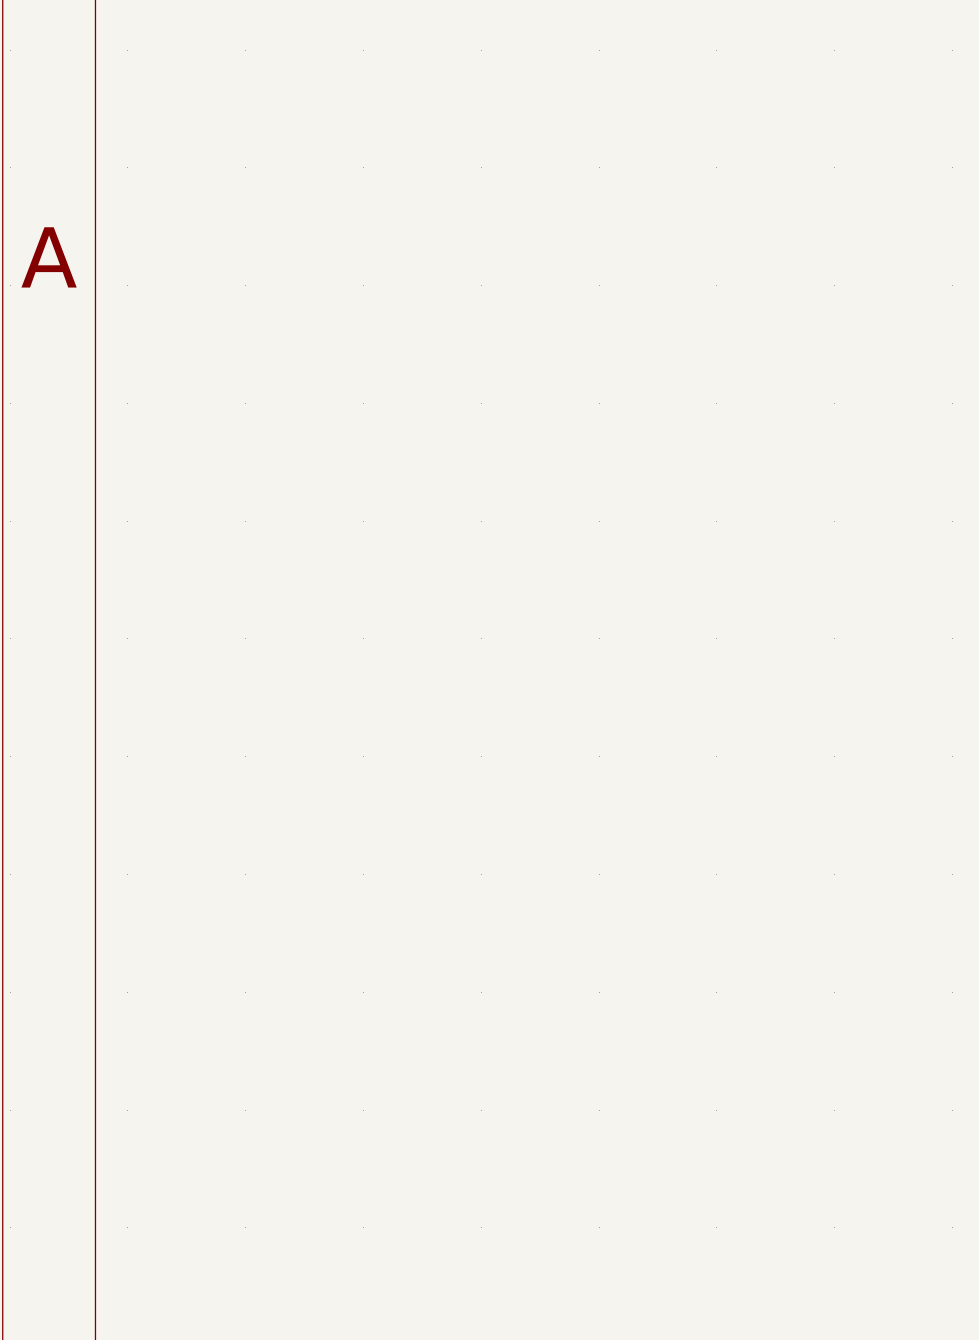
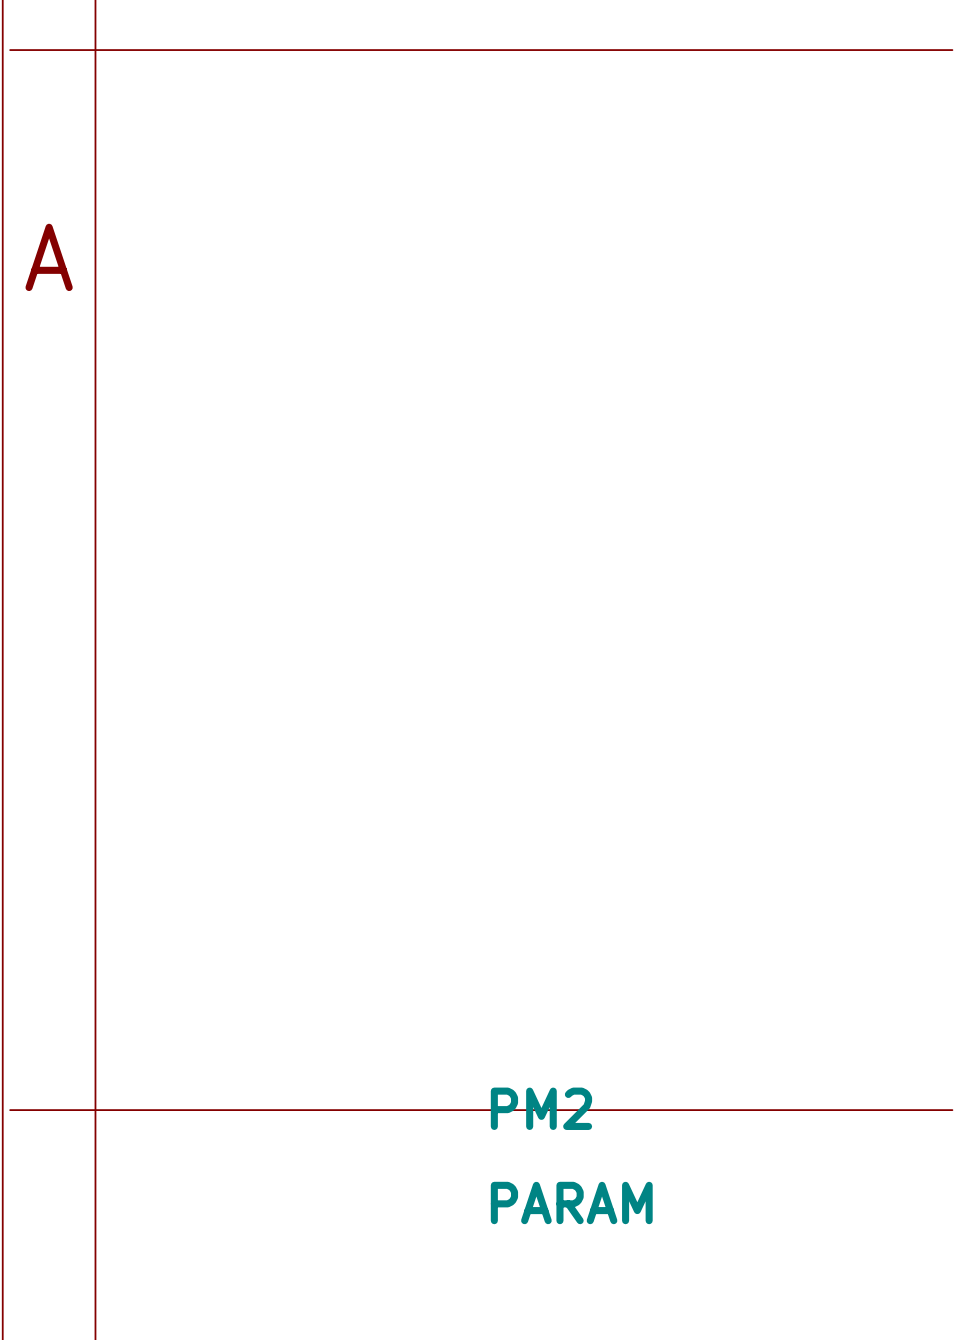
part: none -> (481, 50)
PM2: none -> PARAM (481, 1110)

